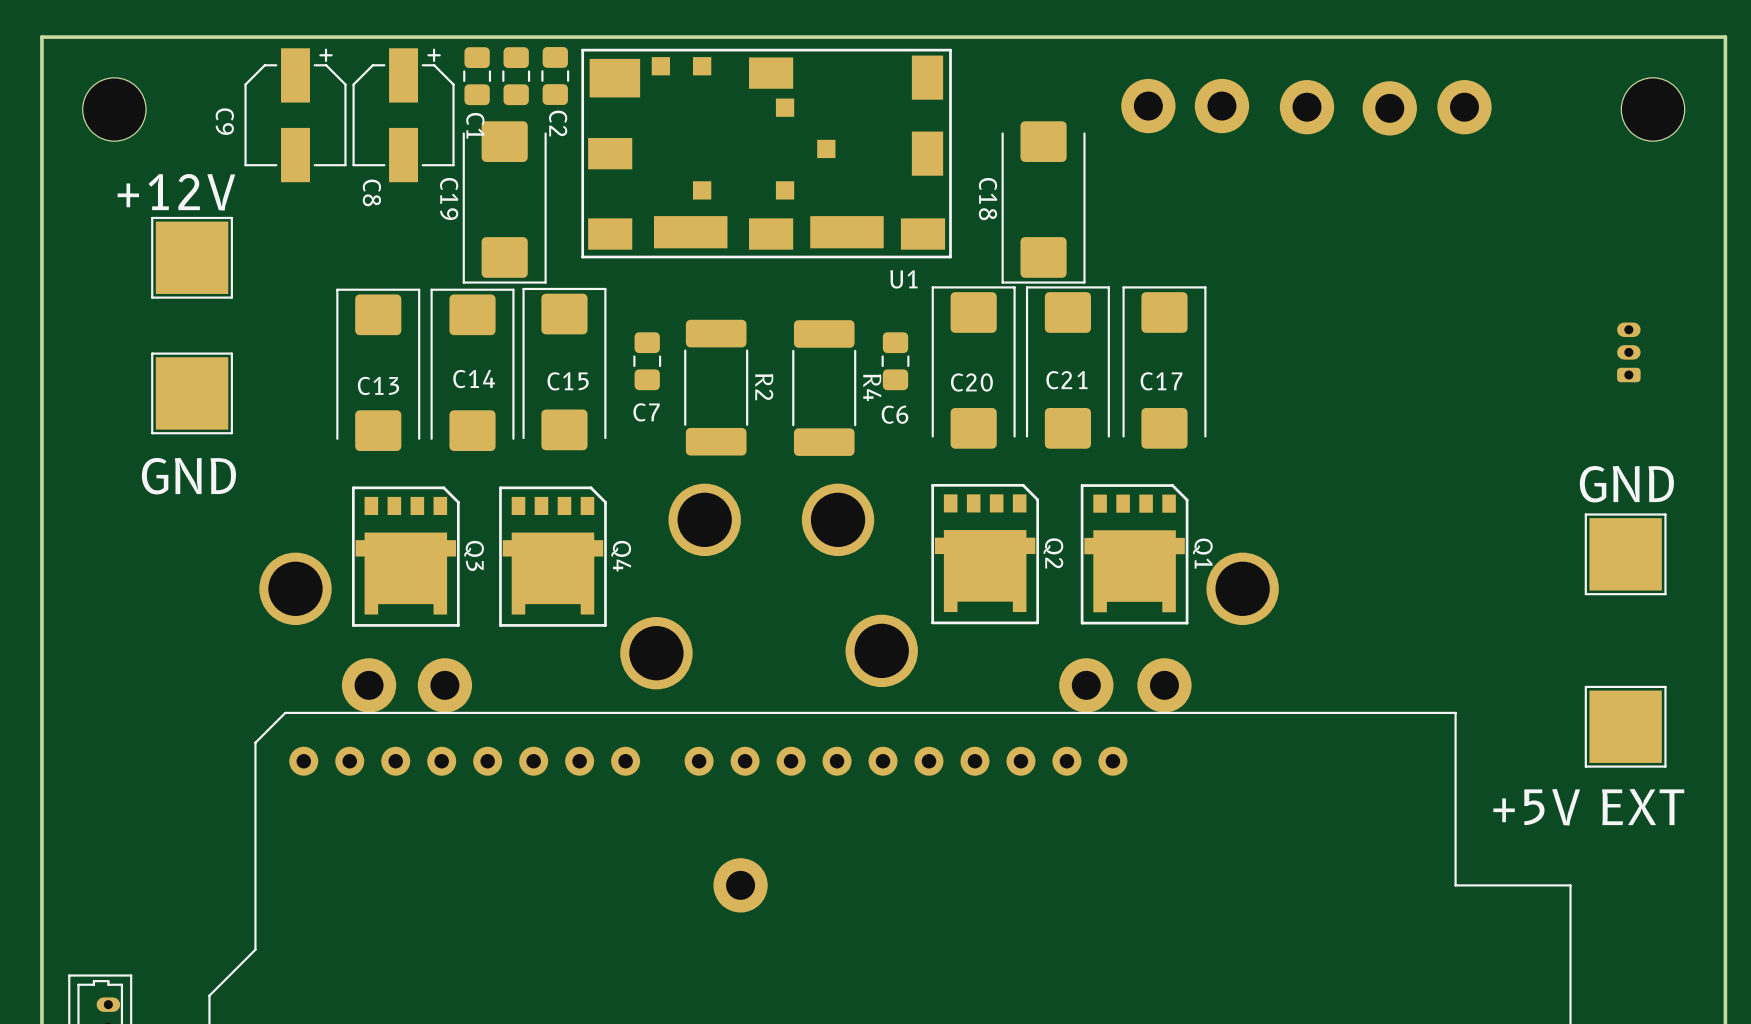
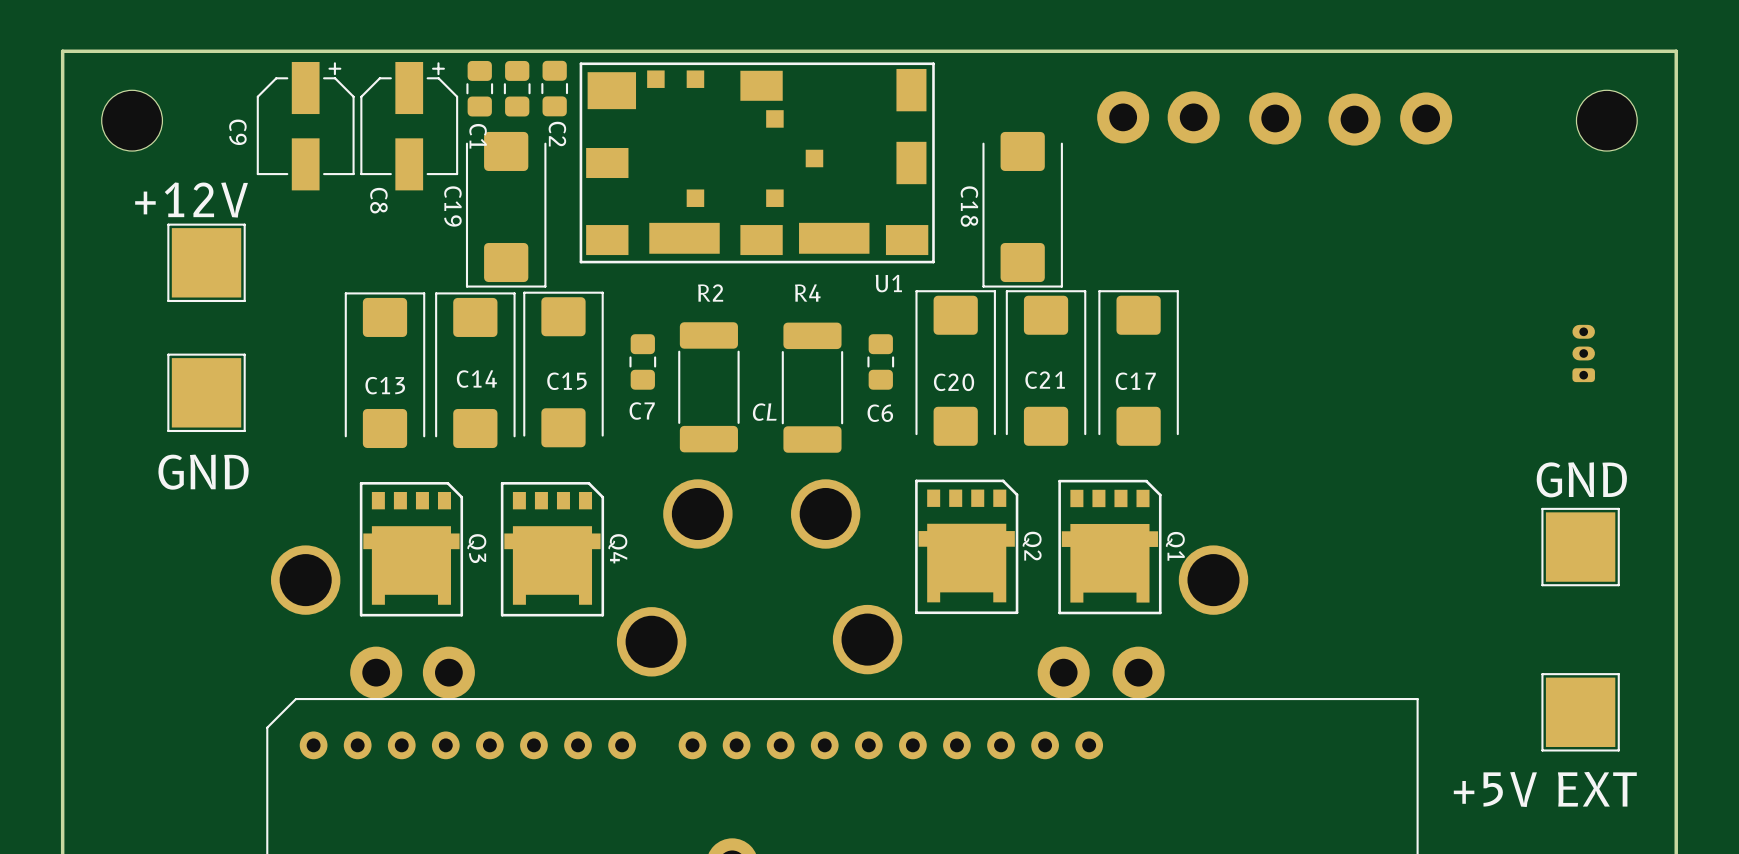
R2 name rotation: 0° (764, 387) -> 90° counterclockwise (710, 293)
R2 name position: R2 (764, 387) -> R2 (710, 293)
R4 name rotation: 0° (872, 387) -> 90° counterclockwise (807, 293)
R4 name position: R4 (872, 387) -> R4 (807, 293)
text: none -> CL (764, 412)

